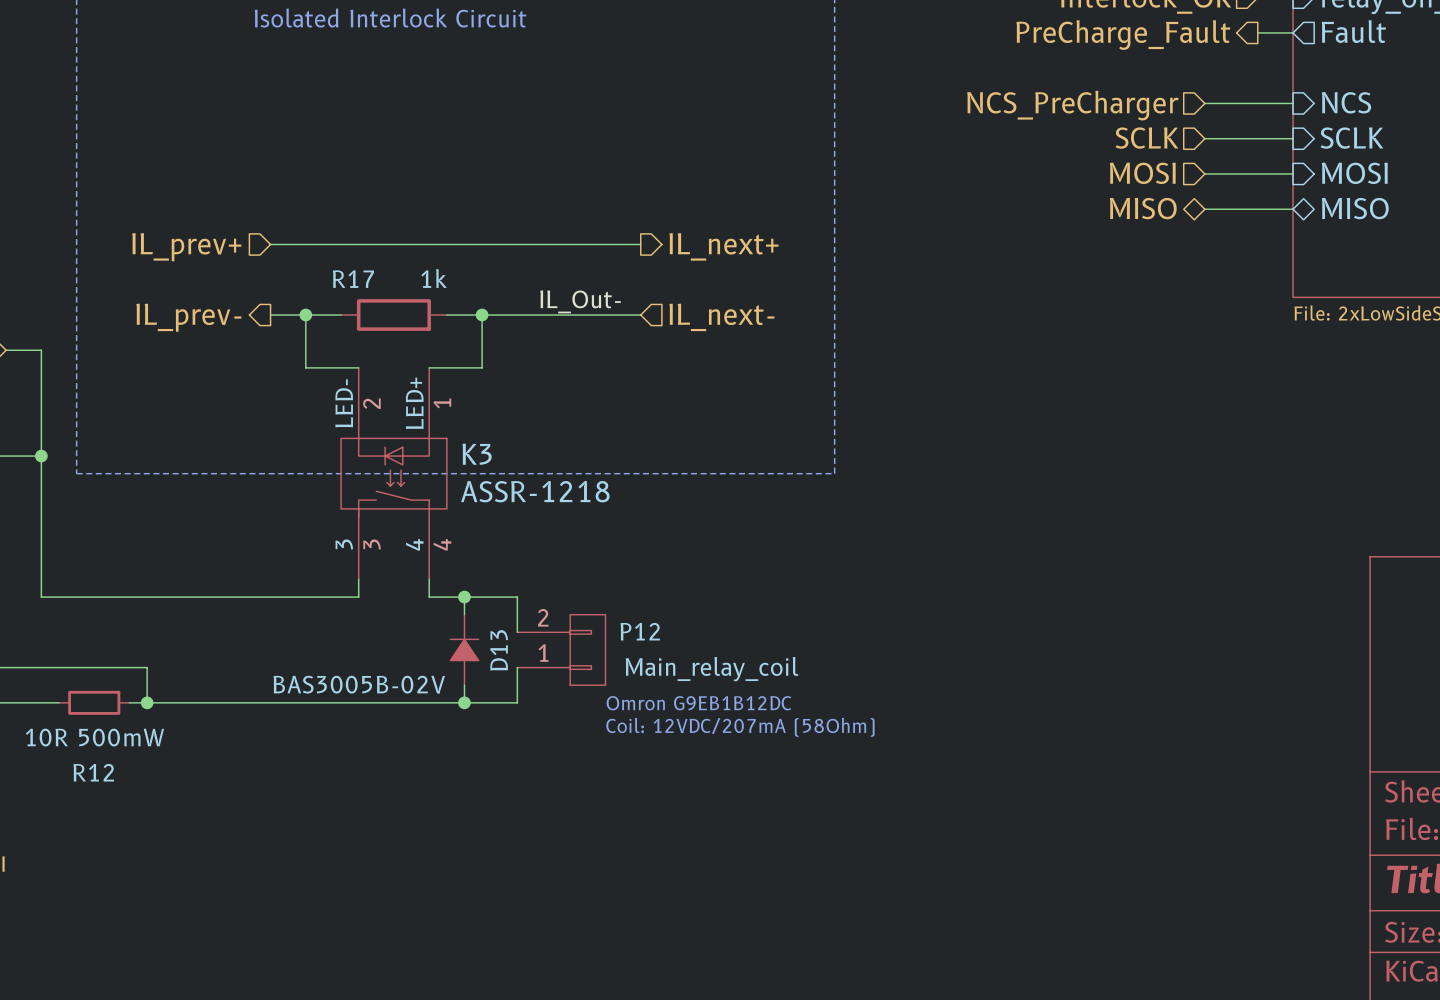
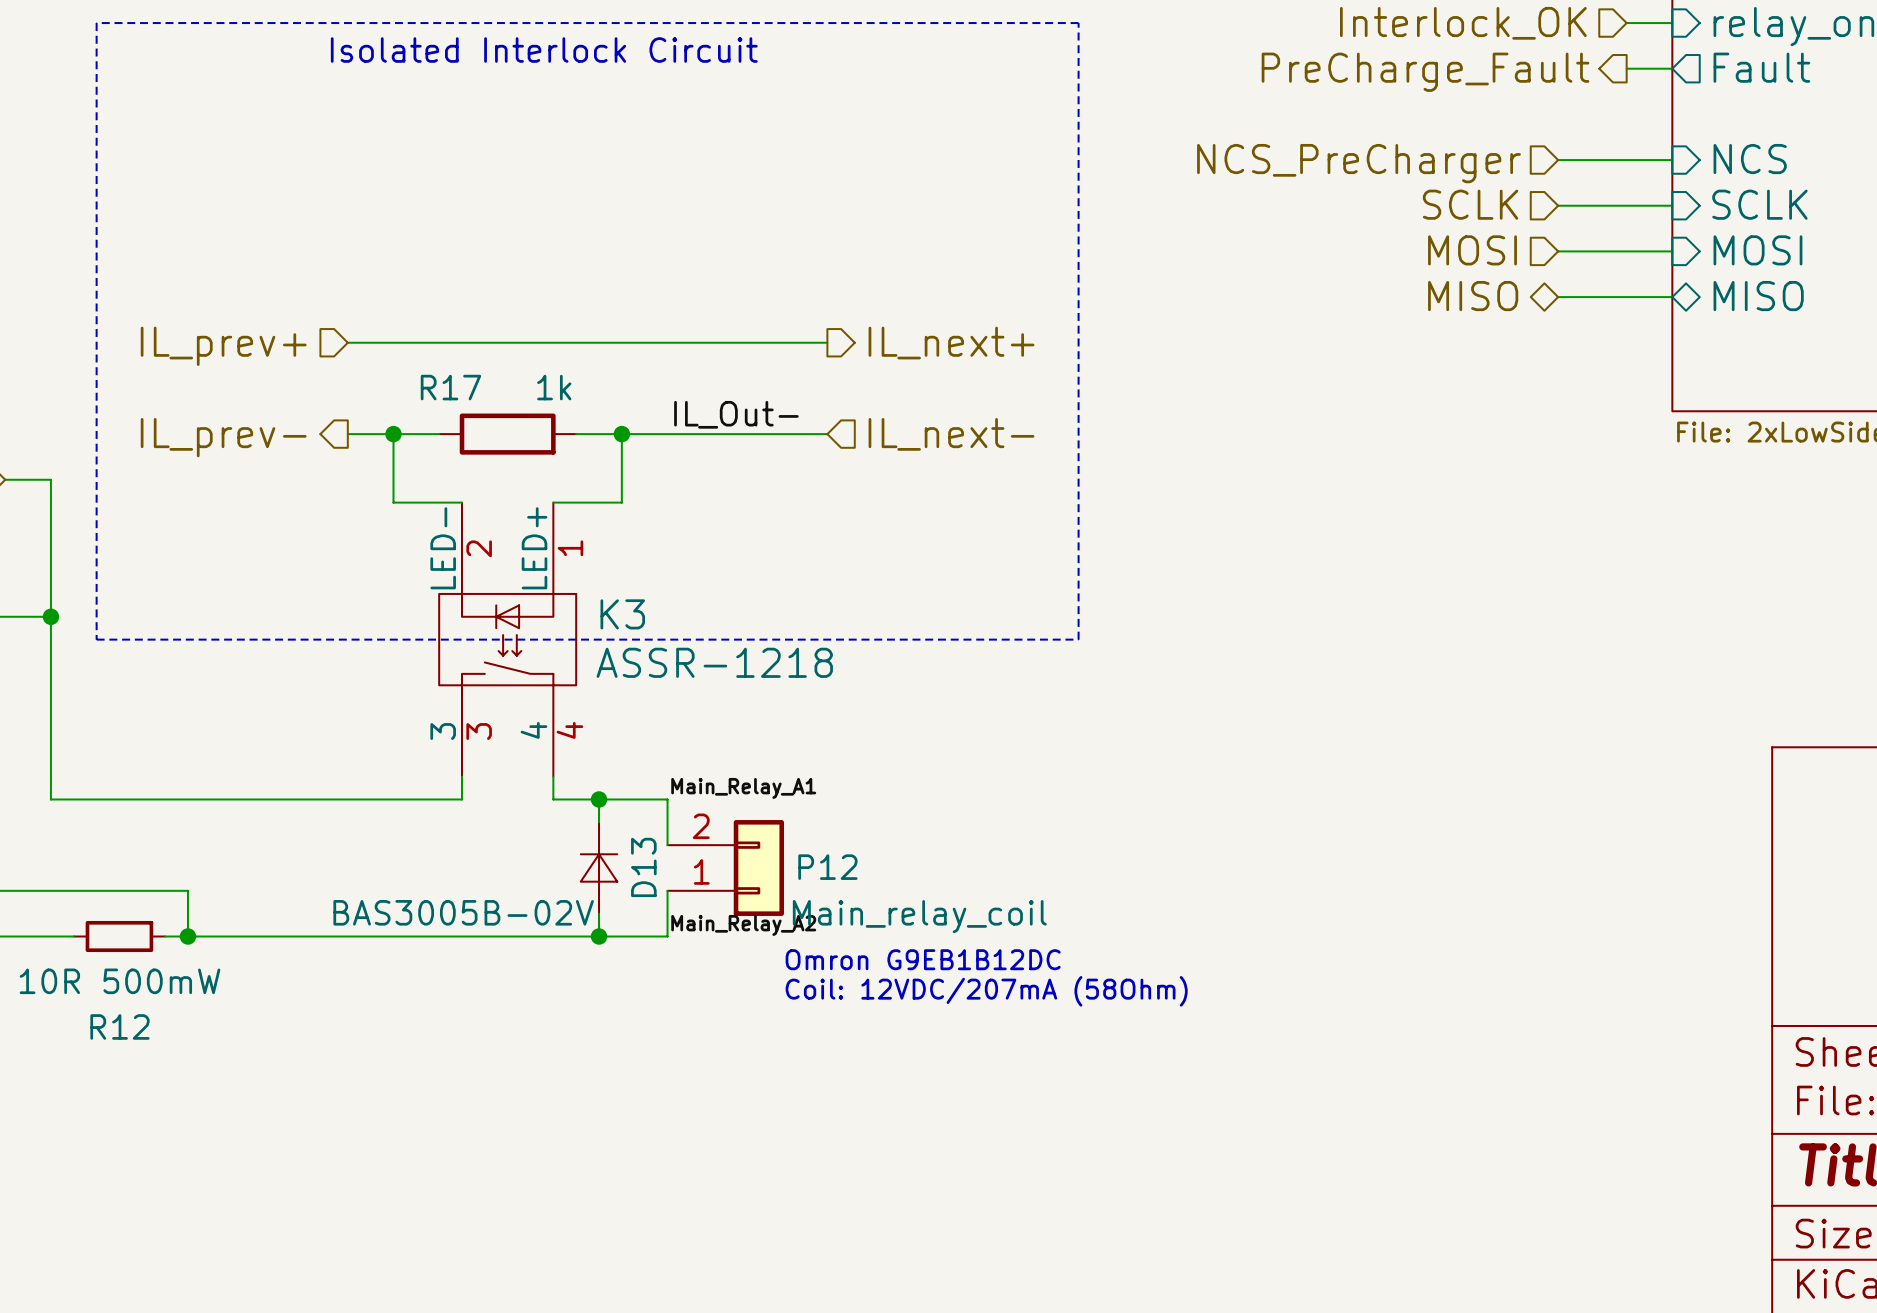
label: none -> Main_Relay_A1 (743, 788)
D13 symbol: [450, 614, 479, 686] -> [580, 822, 618, 914]
P12 symbol: [517, 614, 606, 686] -> [667, 820, 784, 916]
label: none -> Main_Relay_A2 (743, 925)
text: Omron G9EB1B12DC (698, 703) -> none
text: Coil: 12VDC/207mA (58Ohm) (740, 727) -> Omron G9EB1B12DC (923, 959)
text: none -> Coil: 12VDC/207mA (58Ohm) (986, 991)

